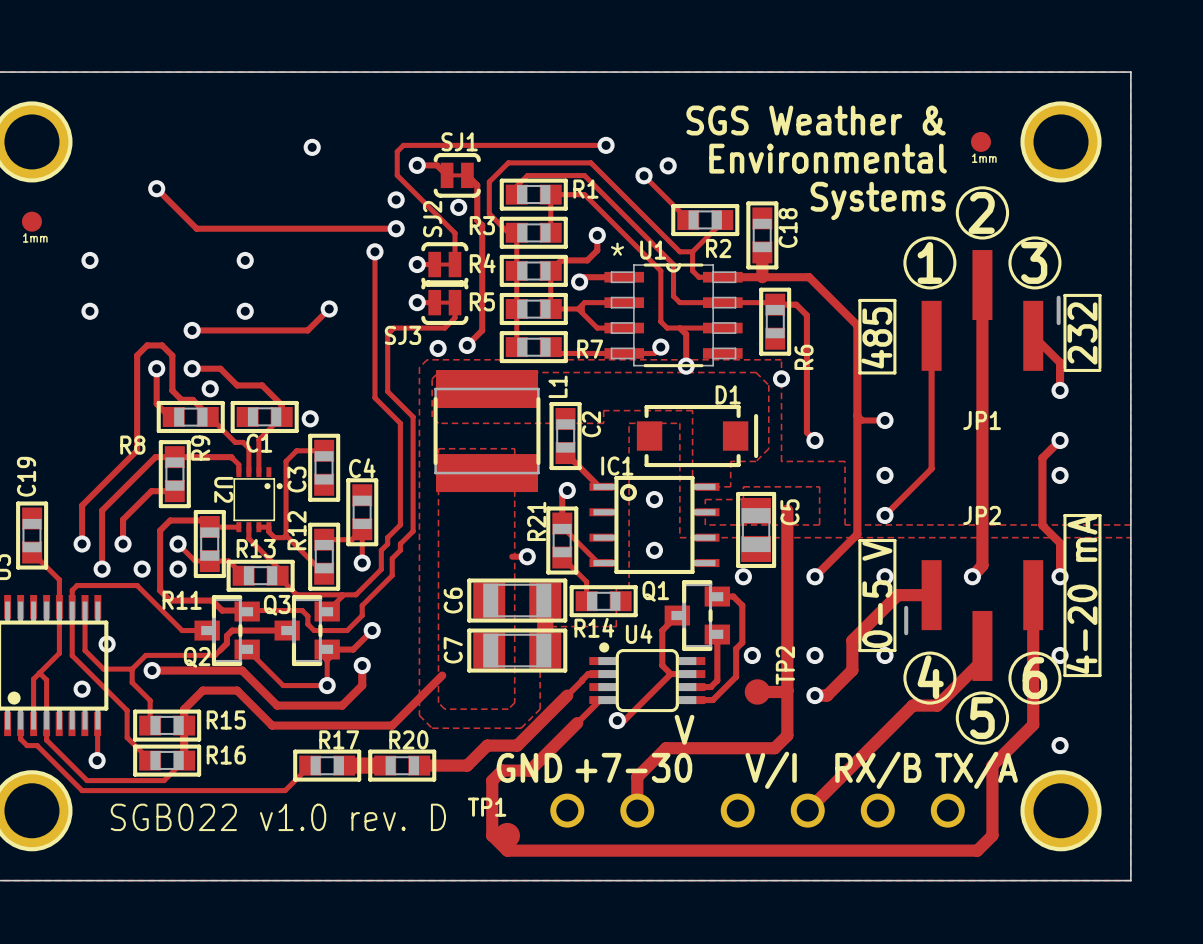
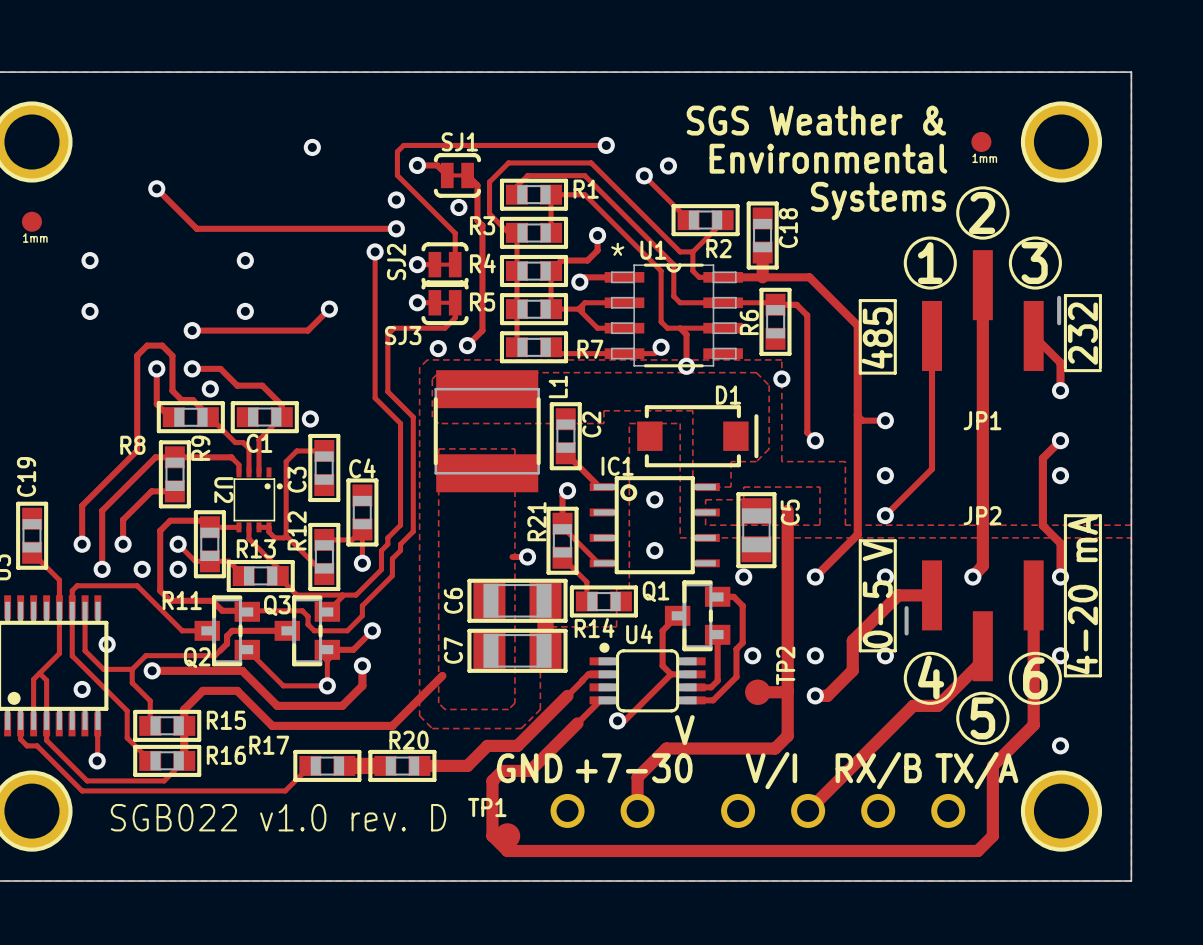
SJ2 name position: SJ2 (432, 219) -> SJ2 (396, 262)
R6 name position: R6 (804, 357) -> R6 (749, 322)
R17 name position: R17 (339, 739) -> R17 (269, 745)

